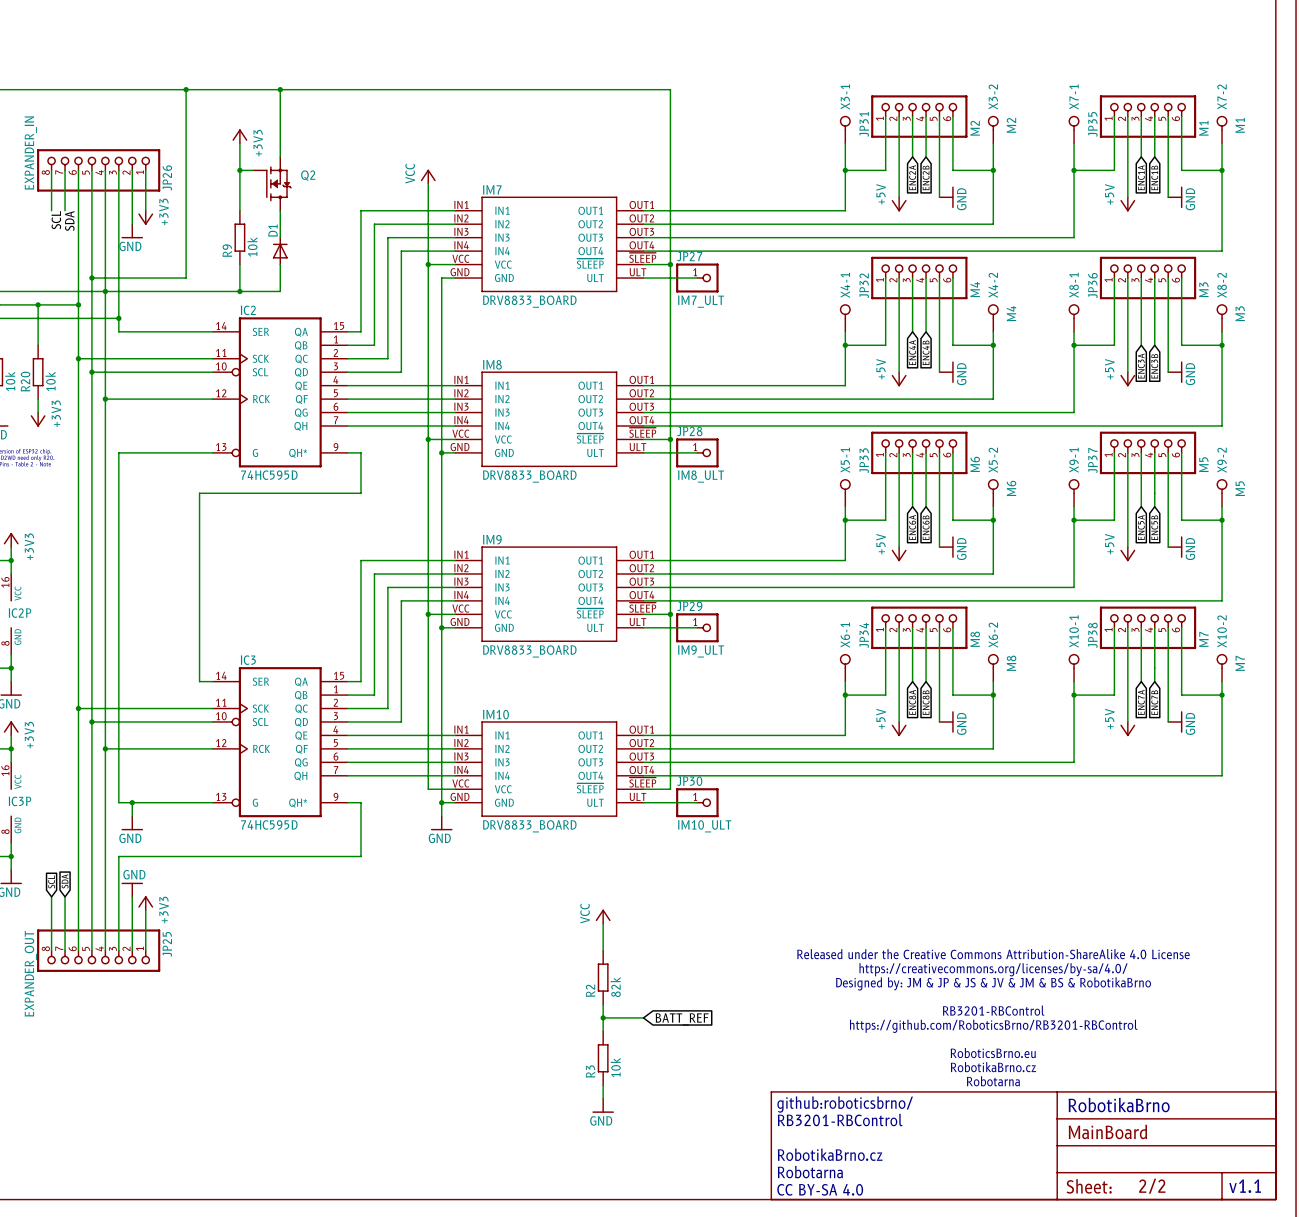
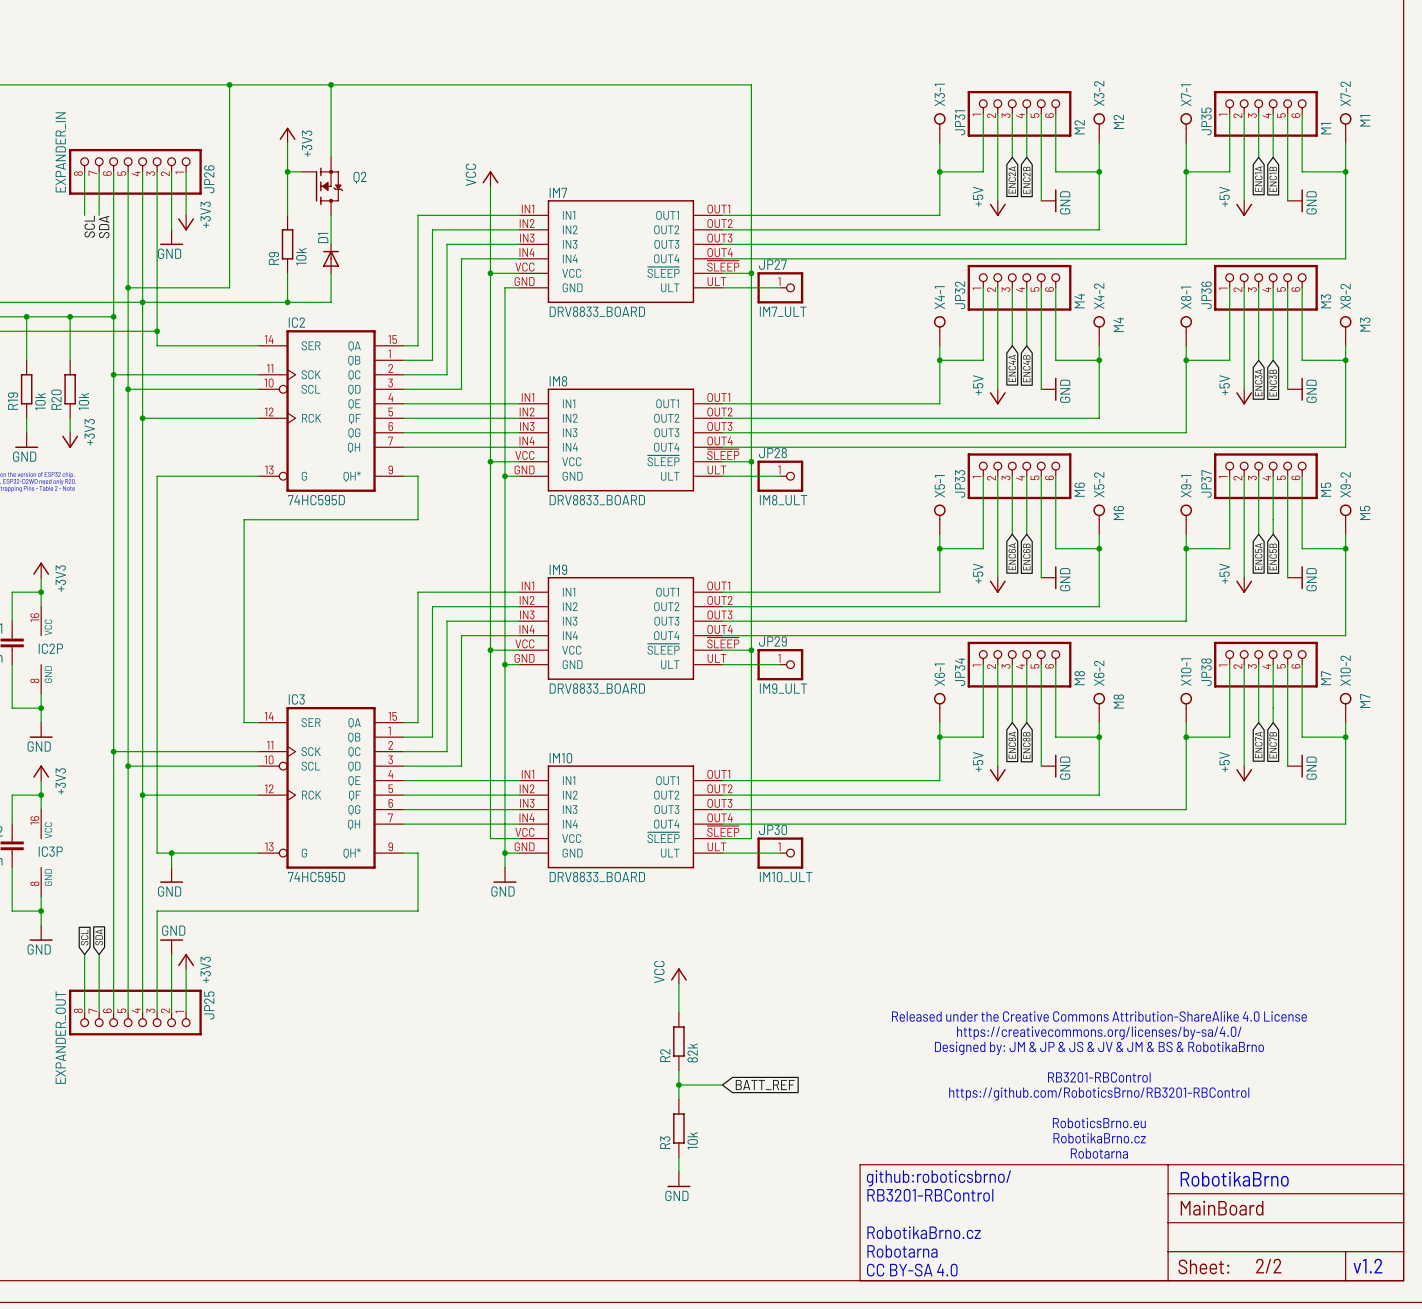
text: v1.1 (1245, 1186) -> v1.2 (1367, 1266)

